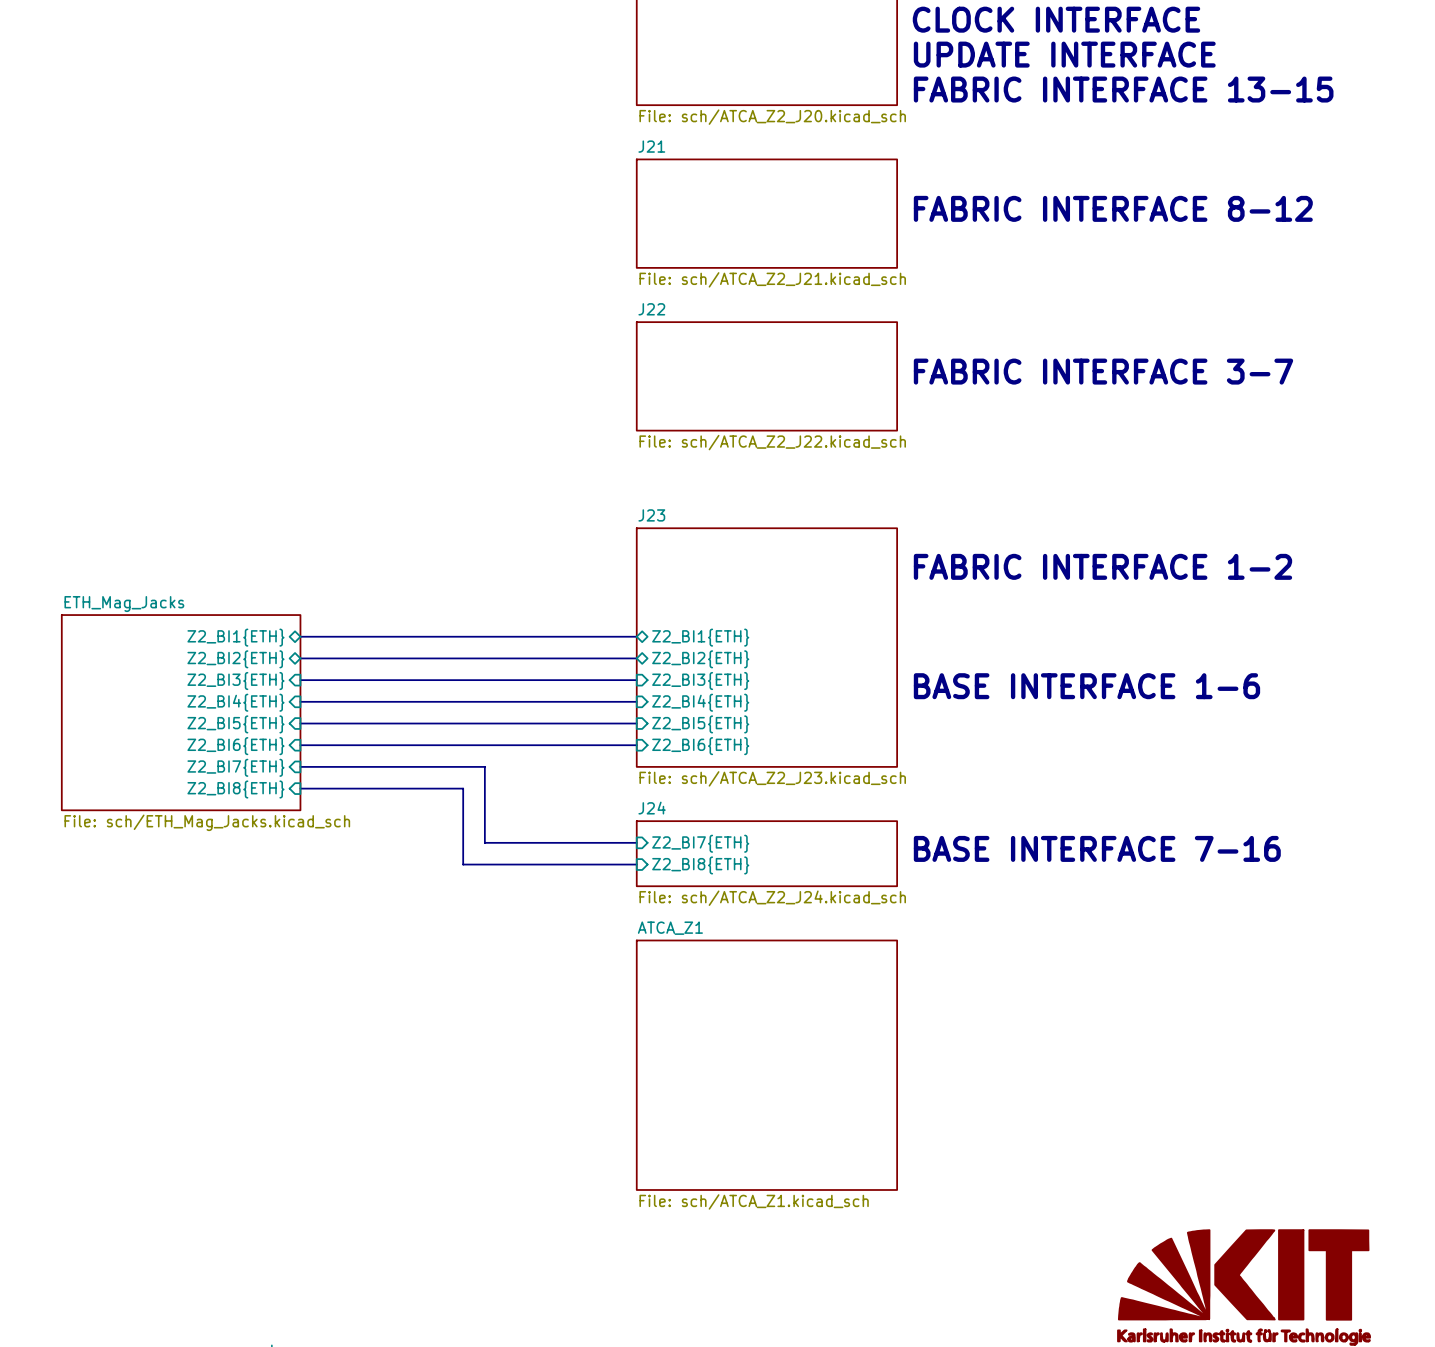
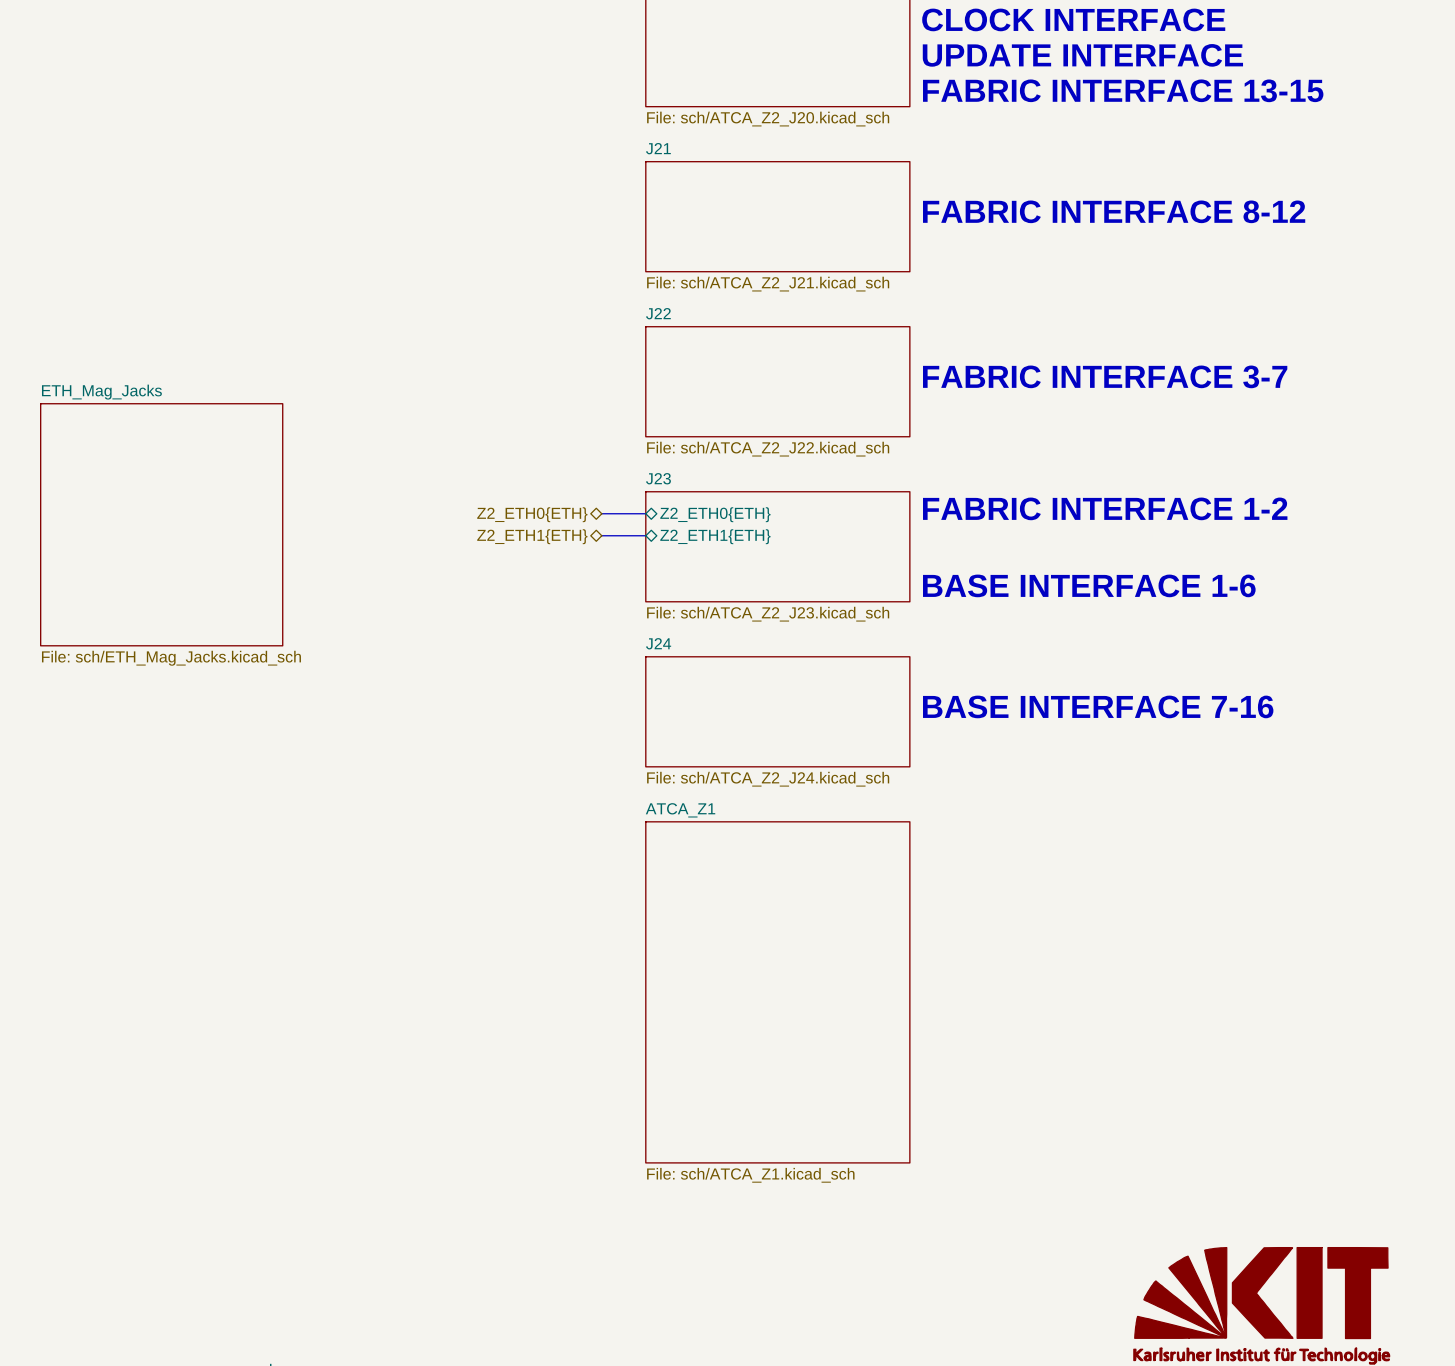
bus: none -> (601, 513) (645, 513)
hierarchical label: none -> Z2_ETH0{ETH} (532, 514)
sheet pin: none -> Z2_ETH0{ETH} (715, 514)
sheet J23 name position: J23 (651, 515) -> J23 (658, 478)
sheet ETH_Mag_Jacks: none -> File: sch/ETH_Mag_Jacks.kicad_sch (161, 524)
sheet J23 shape: [636, 527, 898, 768] -> [645, 491, 911, 603]
bus: none -> (601, 535) (645, 535)
hierarchical label: none -> Z2_ETH1{ETH} (532, 536)
sheet pin: none -> Z2_ETH1{ETH} (715, 536)
text position: FABRIC INTERFACE 1-2 (1102, 566) -> FABRIC INTERFACE 1-2 (1105, 508)
bus: (300, 636) (636, 636) -> none
sheet pin: Z2_BI1{ETH} (235, 637) -> none
sheet pin: Z2_BI1{ETH} (700, 637) -> none
bus: (300, 658) (636, 658) -> none
sheet pin: Z2_BI2{ETH} (235, 659) -> none
sheet pin: Z2_BI2{ETH} (700, 659) -> none
bus: (300, 680) (636, 680) -> none
sheet pin: Z2_BI3{ETH} (235, 681) -> none
sheet pin: Z2_BI3{ETH} (700, 681) -> none
text position: BASE INTERFACE 1-6 (1086, 686) -> BASE INTERFACE 1-6 (1089, 585)
bus: (300, 701) (636, 701) -> none
sheet pin: Z2_BI4{ETH} (235, 702) -> none
sheet pin: Z2_BI4{ETH} (700, 702) -> none
sheet ETH_Mag_Jacks: File: sch/ETH_Mag_Jacks.kicad_sch (181, 712) -> none
bus: (300, 723) (636, 723) -> none
sheet pin: Z2_BI5{ETH} (235, 724) -> none
sheet pin: Z2_BI5{ETH} (700, 724) -> none
bus: (300, 745) (636, 745) -> none
sheet pin: Z2_BI6{ETH} (235, 746) -> none
sheet pin: Z2_BI6{ETH} (700, 746) -> none
bus: (300, 766) (484, 766) (484, 842) (636, 842) -> none
sheet pin: Z2_BI7{ETH} (235, 767) -> none
sheet J23 value position: File: sch/ATCA_Z2_J23.kicad_sch (772, 778) -> File: sch/ATCA_Z2_J23.kicad_sch (768, 614)
bus: (300, 788) (463, 788) (463, 864) (636, 864) -> none
sheet pin: Z2_BI8{ETH} (235, 789) -> none
sheet J24 name position: J24 (652, 808) -> J24 (658, 643)
sheet J24 shape: [636, 820, 898, 887] -> [645, 656, 911, 768]
sheet pin: Z2_BI7{ETH} (700, 843) -> none
text position: BASE INTERFACE 7-16 (1097, 848) -> BASE INTERFACE 7-16 (1098, 706)
sheet pin: Z2_BI8{ETH} (700, 865) -> none
sheet J24 value position: File: sch/ATCA_Z2_J24.kicad_sch (772, 898) -> File: sch/ATCA_Z2_J24.kicad_sch (768, 779)
sheet ATCA_Z1 name position: ATCA_Z1 (670, 928) -> ATCA_Z1 (680, 810)
sheet ATCA_Z1 shape: [636, 939, 898, 1191] -> [645, 821, 911, 1164]
sheet ATCA_Z1 value position: File: sch/ATCA_Z1.kicad_sch (754, 1201) -> File: sch/ATCA_Z1.kicad_sch (750, 1175)

